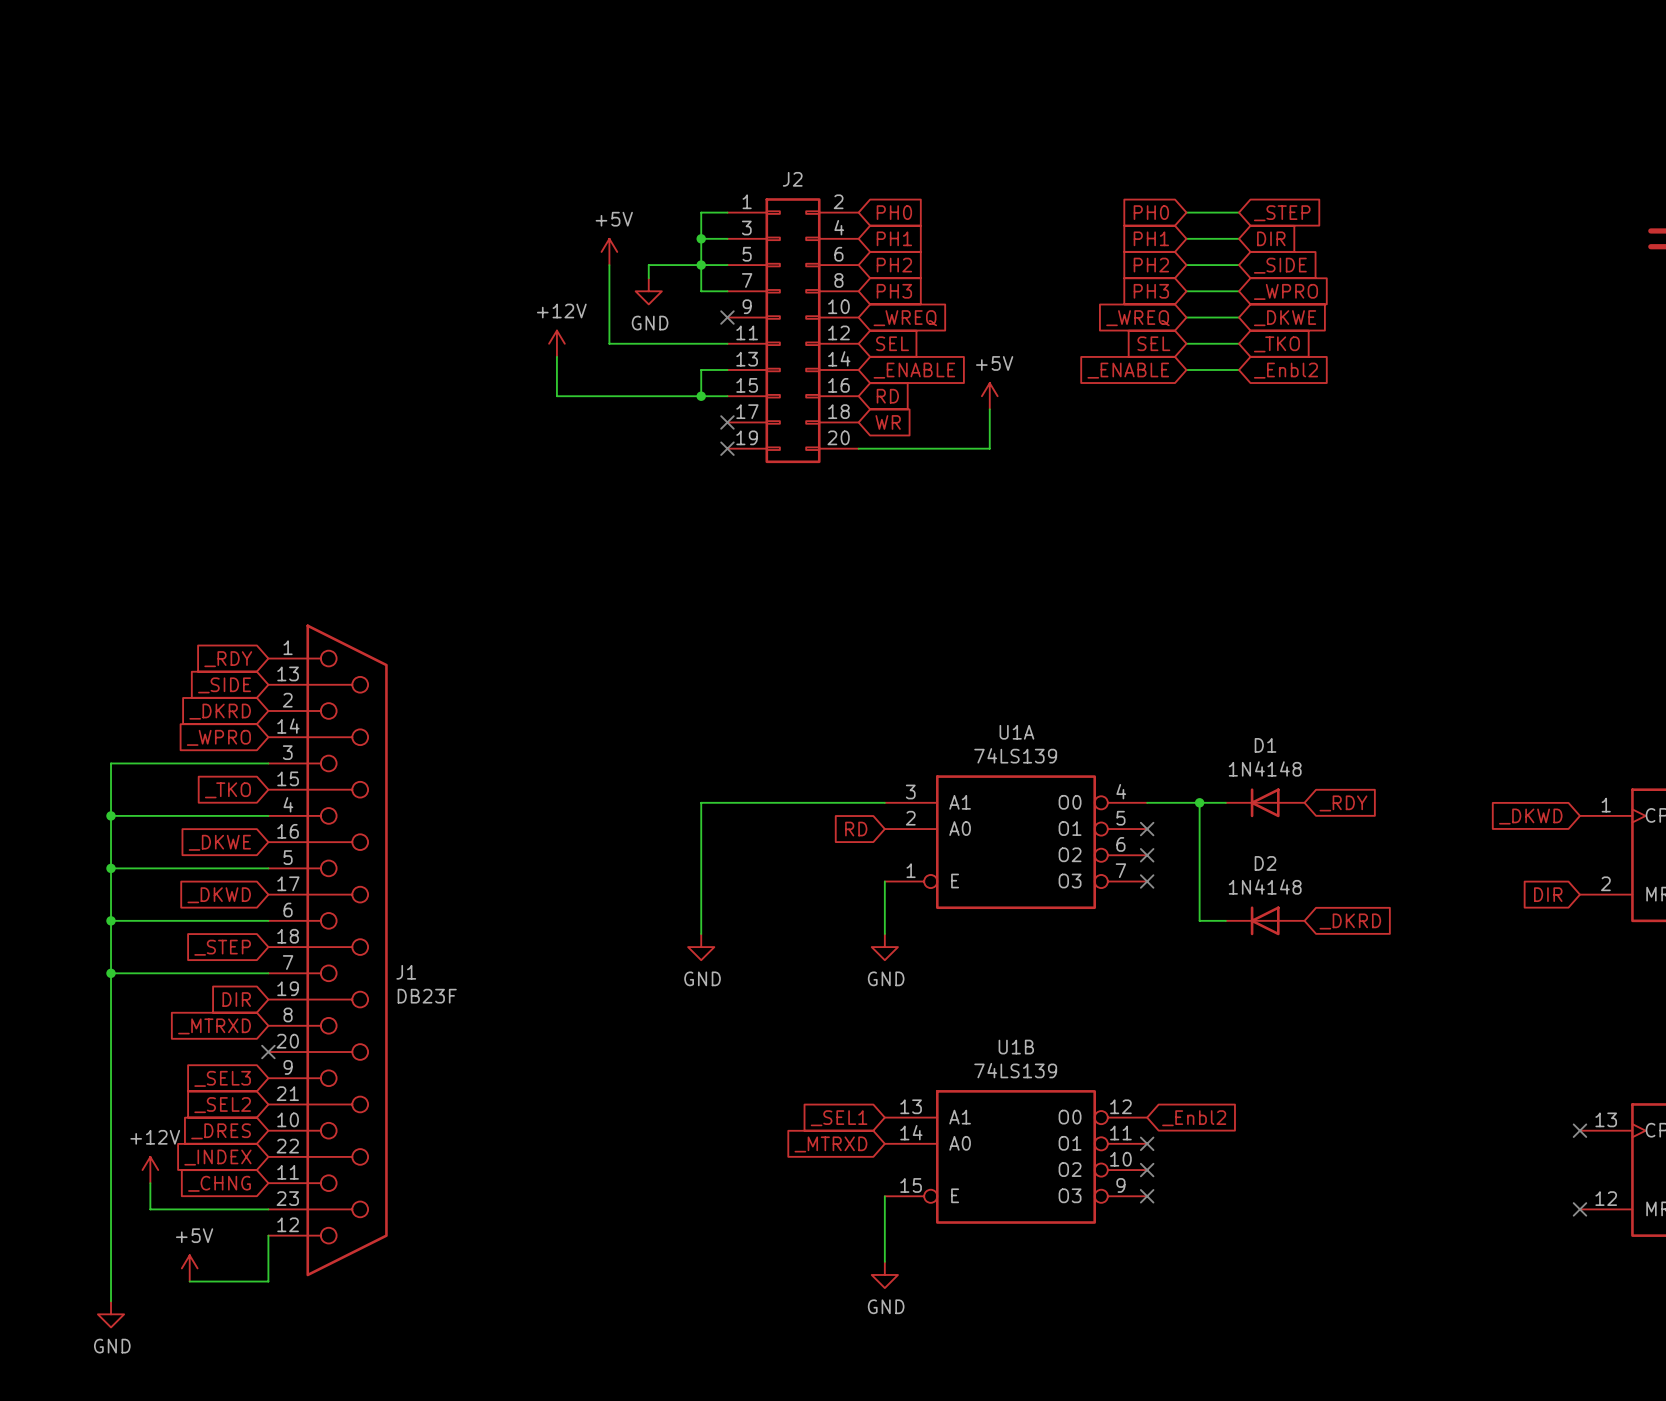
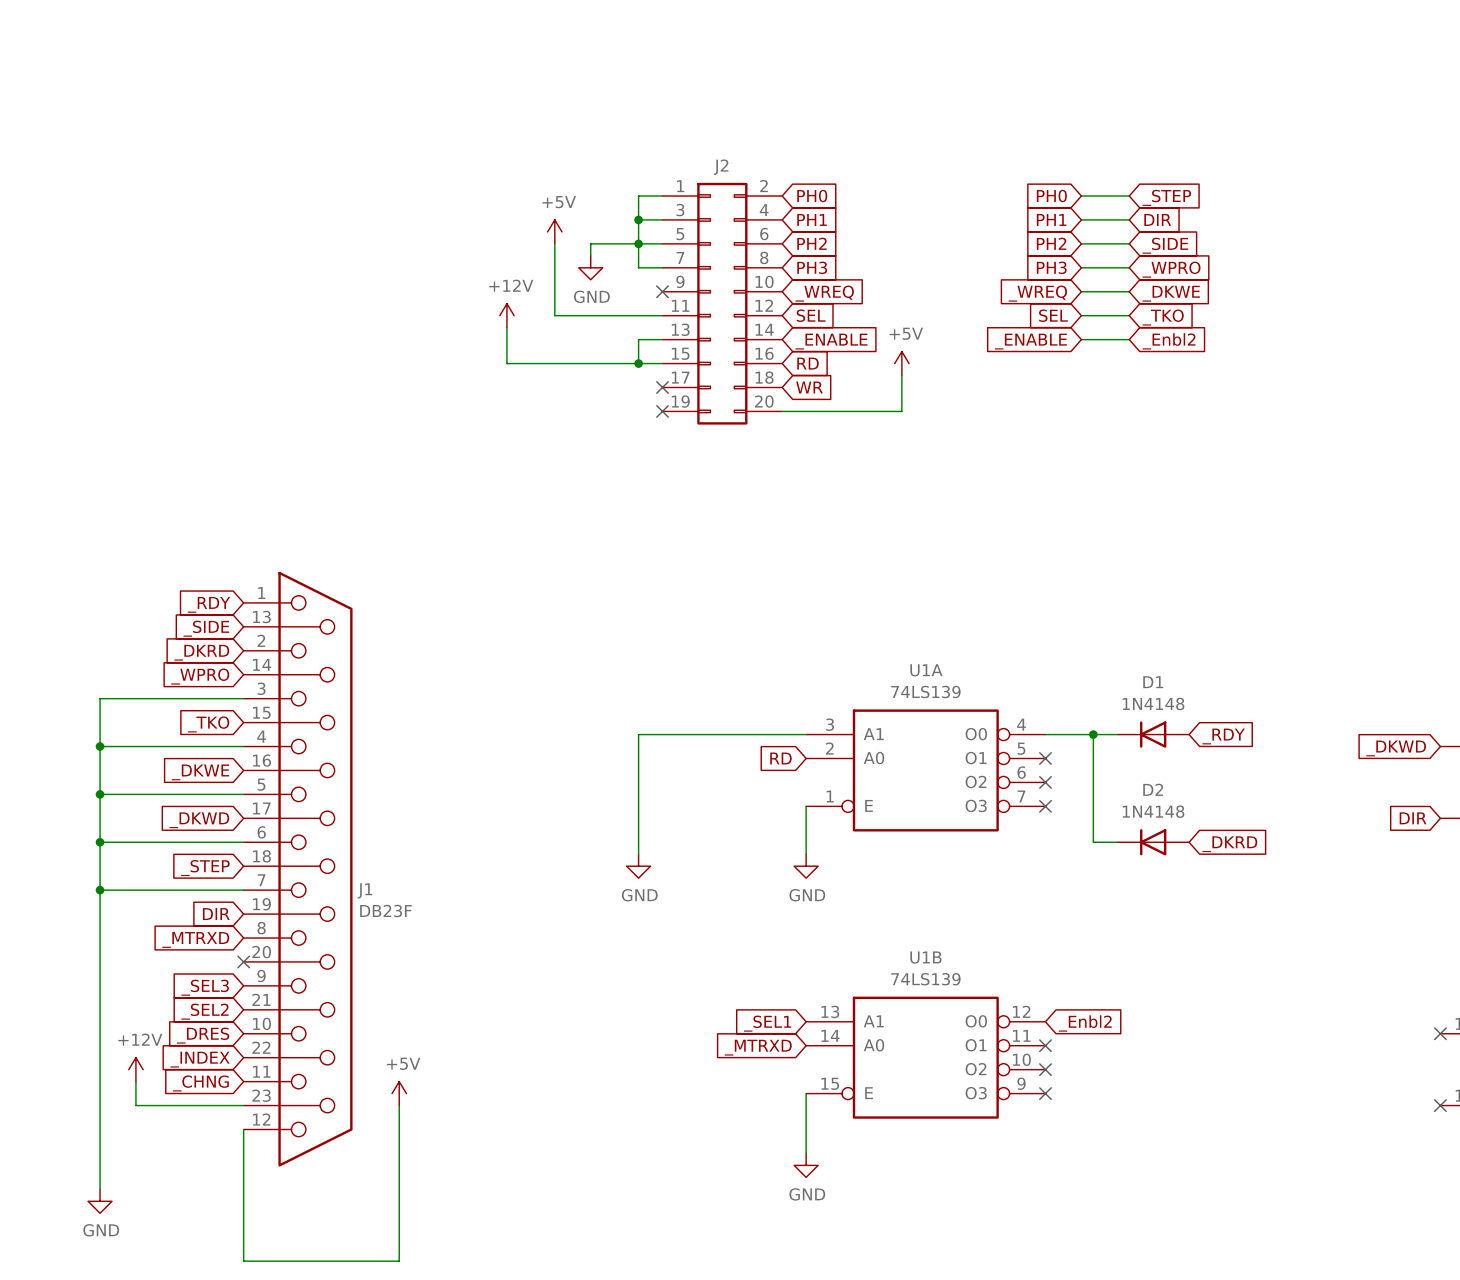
power symbol: none -> +5V (399, 1093)
power symbol: +5V (189, 1268) -> none
wire: (189, 1281) (268, 1281) -> (399, 1105) (399, 1261) (243, 1261) (243, 1171)

